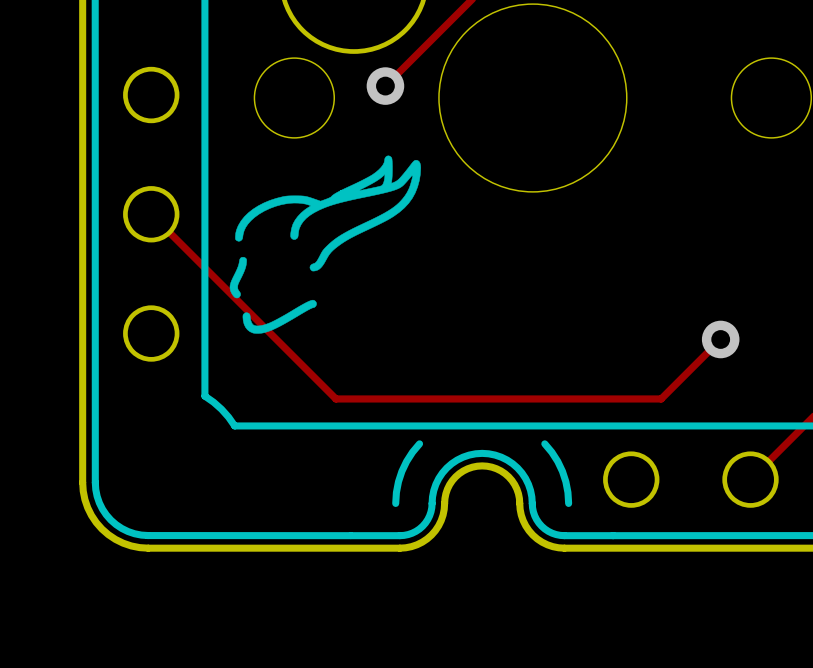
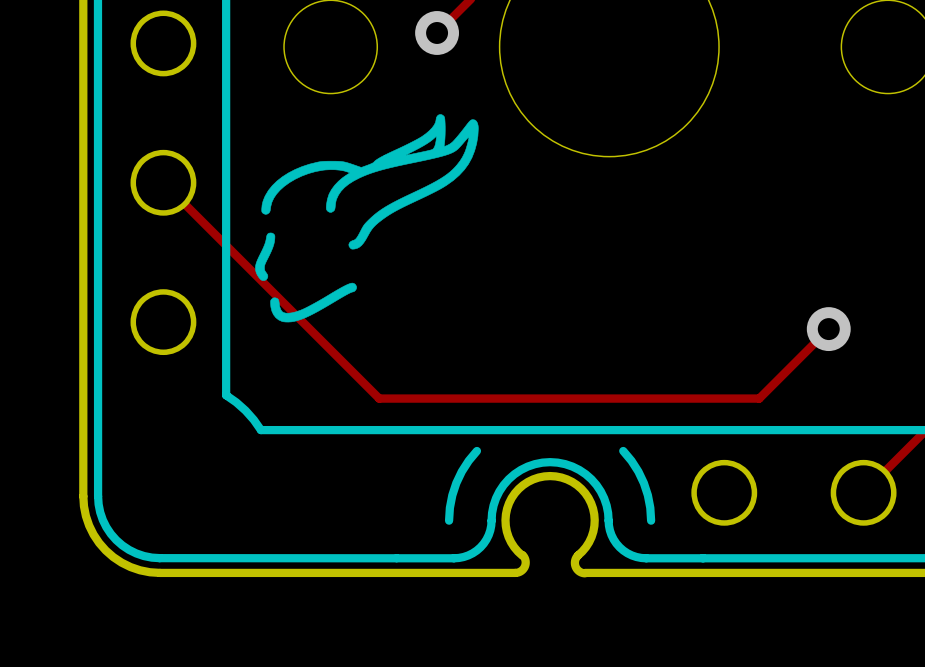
board edge: none -> (522, 555) (514, 547) (506, 531) (505, 520) (509, 503) (518, 488) (533, 479) (550, 476) (561, 477) (581, 488) (593, 508) (594, 520) (591, 537) (575, 561) (577, 570) (584, 573)
board edge: (399, 548) (417, 544) (431, 535) (441, 520) (445, 493) (452, 480) (463, 470) (482, 465) (500, 470) (511, 480) (518, 493) (523, 520) (532, 535) (547, 544) (564, 548) -> (453, 572) (517, 572) (525, 565) (522, 555)
board edge: none -> (584, 572) (646, 572)

